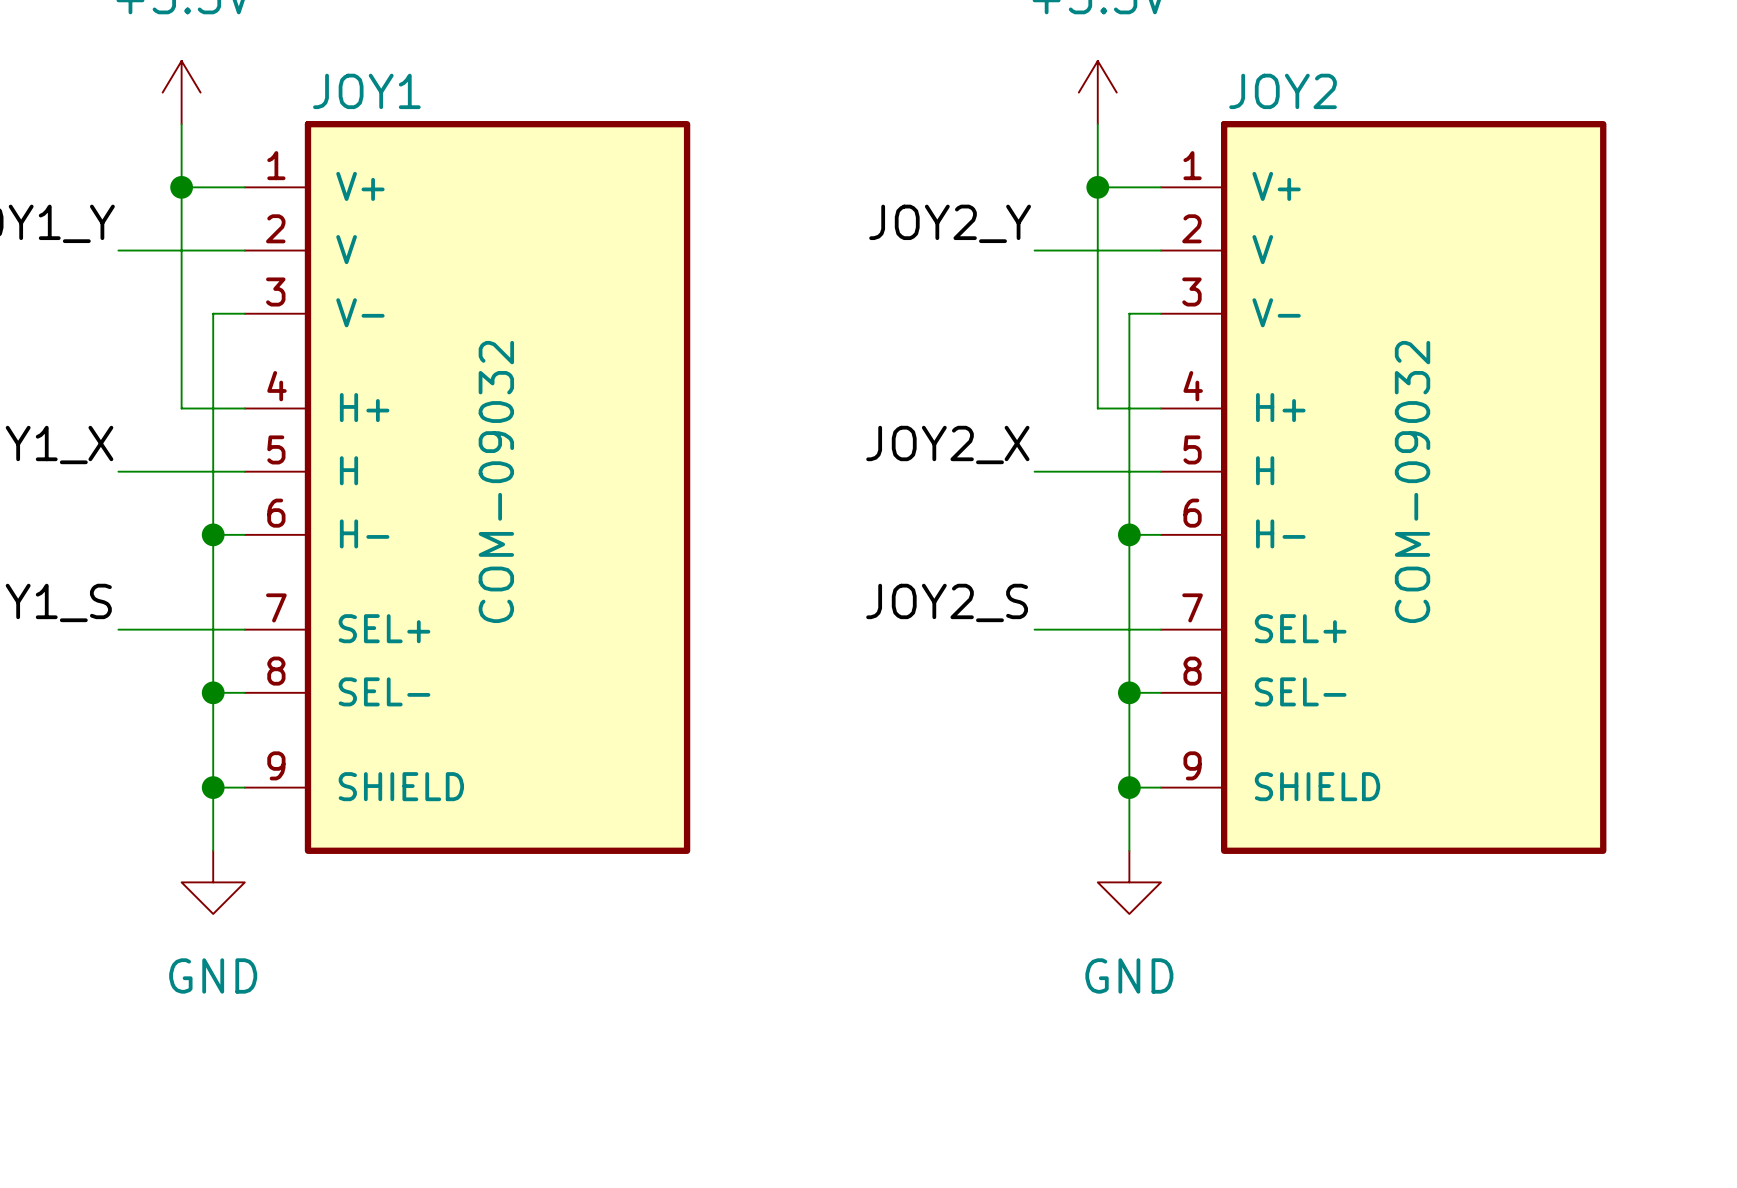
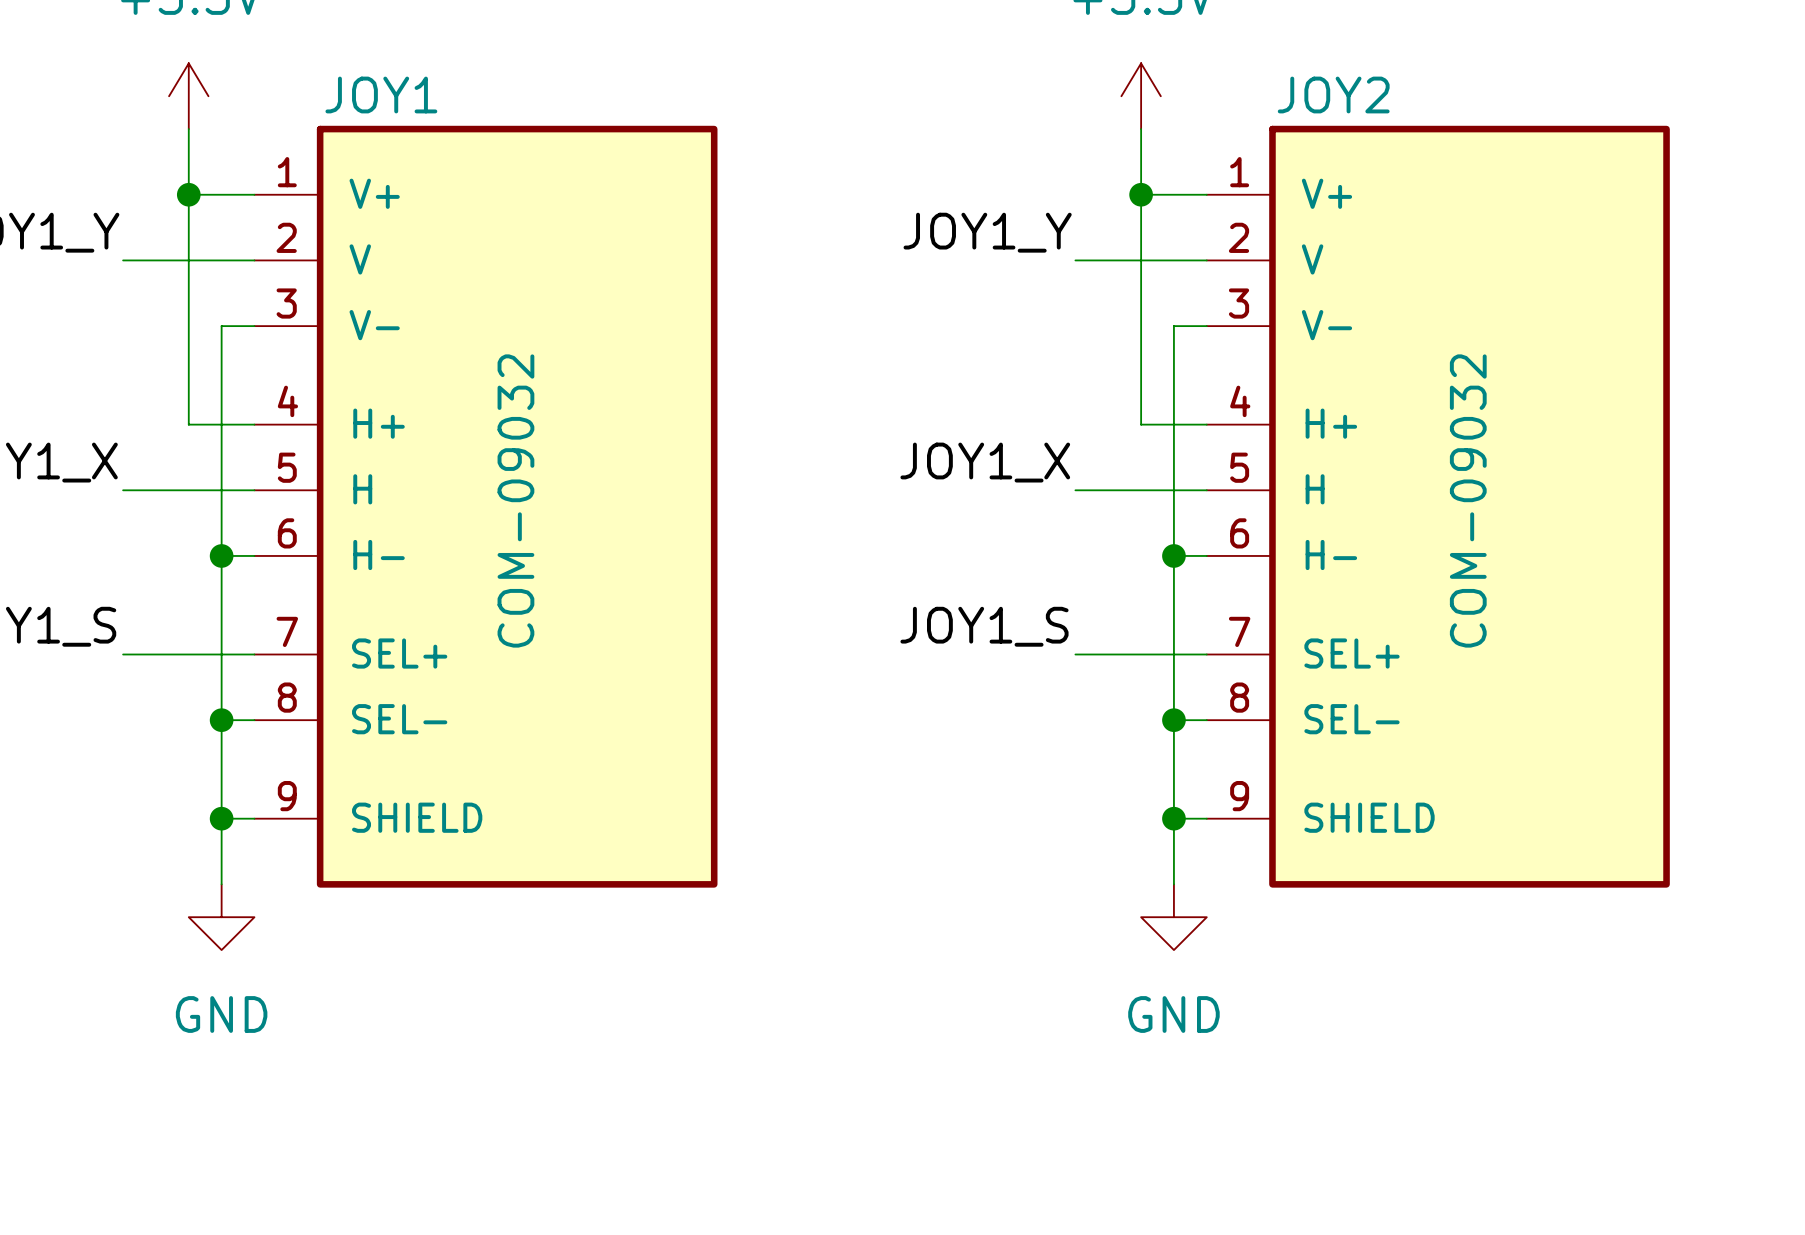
label: JOY2_Y (950, 223) -> JOY1_Y (987, 232)
label: JOY2_X (947, 444) -> JOY1_X (985, 462)
label: JOY2_S (947, 602) -> JOY1_S (984, 626)

